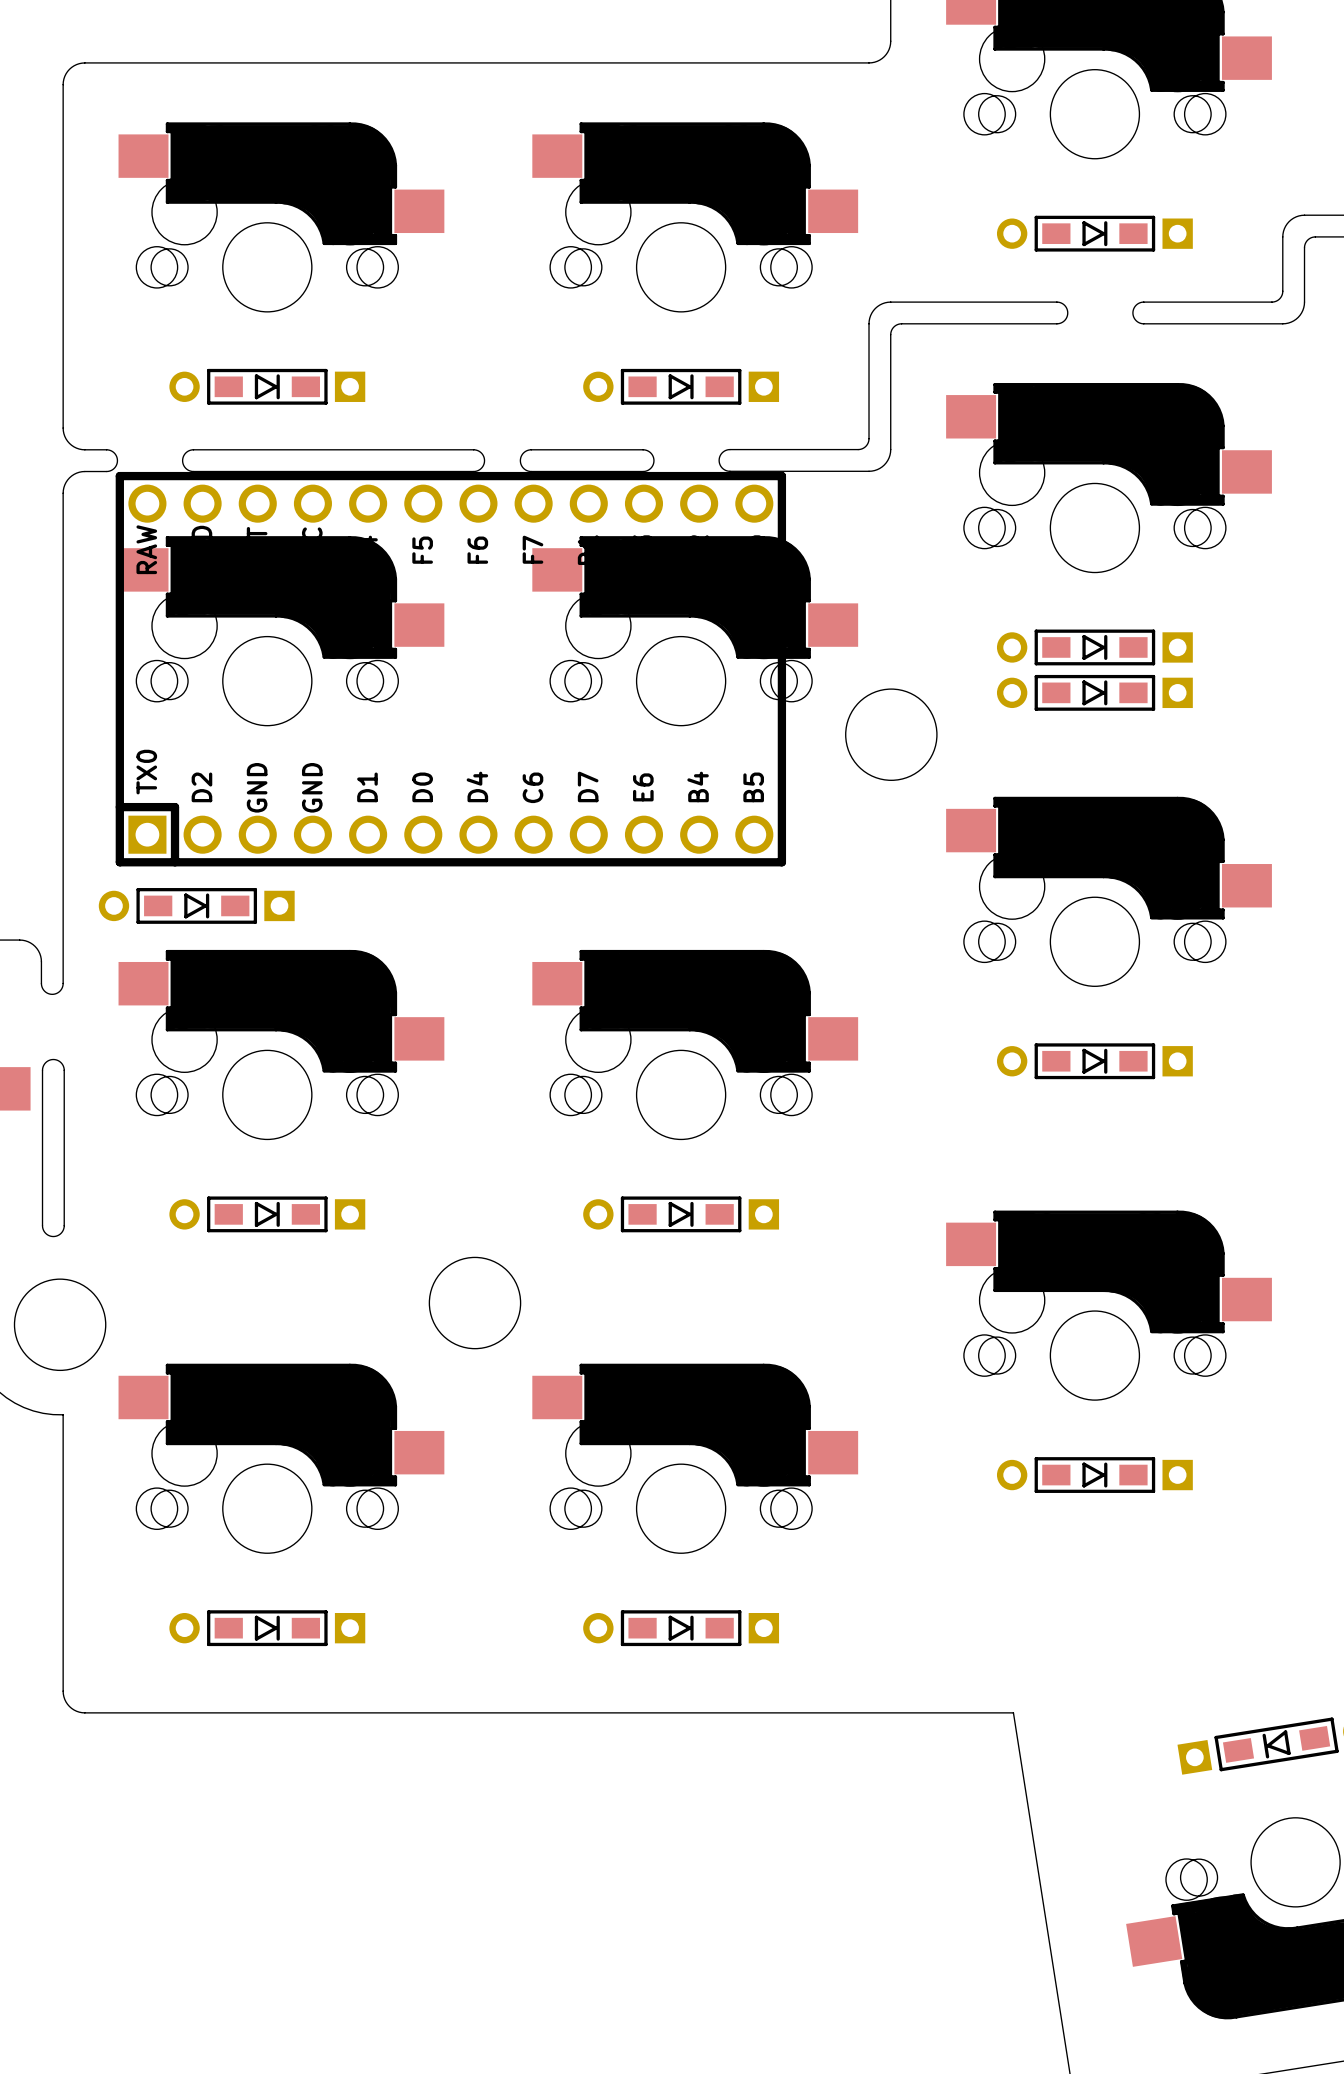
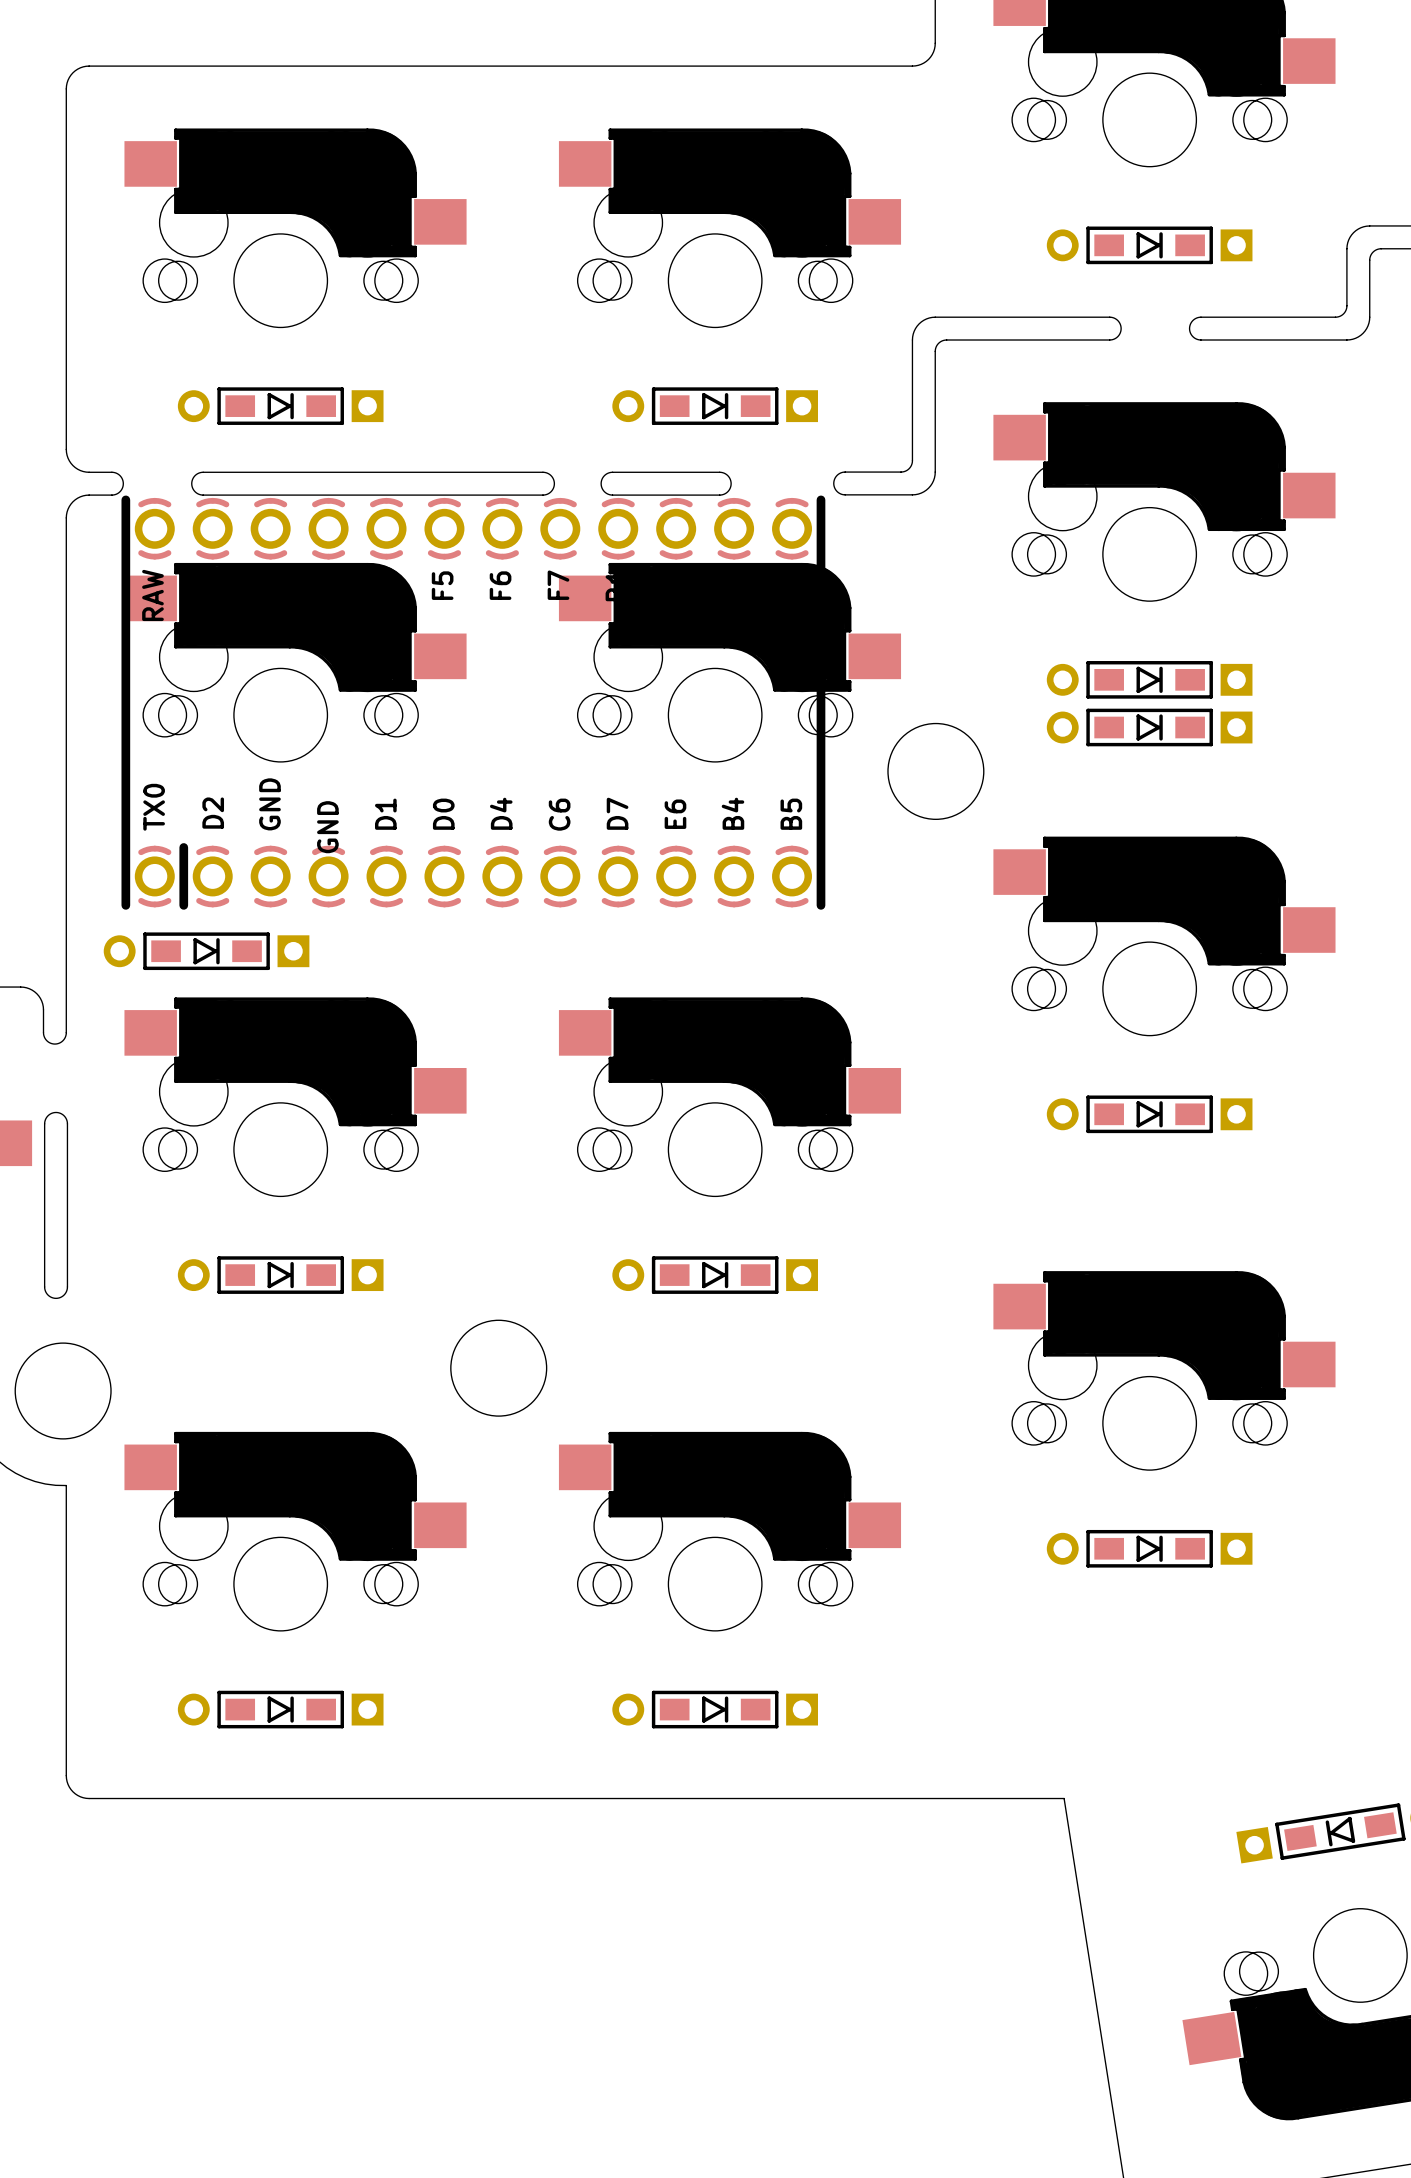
board edge: (473, 449) (481, 452) (484, 460) (481, 468) (473, 471) -> (497, 472) (545, 472) (552, 476) (554, 483) (552, 490) (545, 494) (497, 495)
board edge: (583, 449) (529, 449) (522, 454) (520, 460) (522, 467) (529, 471) (583, 471) -> (612, 472) (604, 475) (601, 483) (604, 491) (612, 495)
board edge: (643, 449) (650, 452) (653, 460) (650, 468) (643, 471) -> (675, 472) (722, 472) (728, 476) (731, 483) (728, 490) (722, 494) (675, 495)
board edge: (804, 449) (728, 449) (722, 452) (719, 460) (722, 468) (728, 471) (804, 471) -> (845, 472) (837, 475) (833, 483) (837, 491) (845, 494)
part footprint: [115, 471, 787, 867] -> [121, 495, 826, 910]

